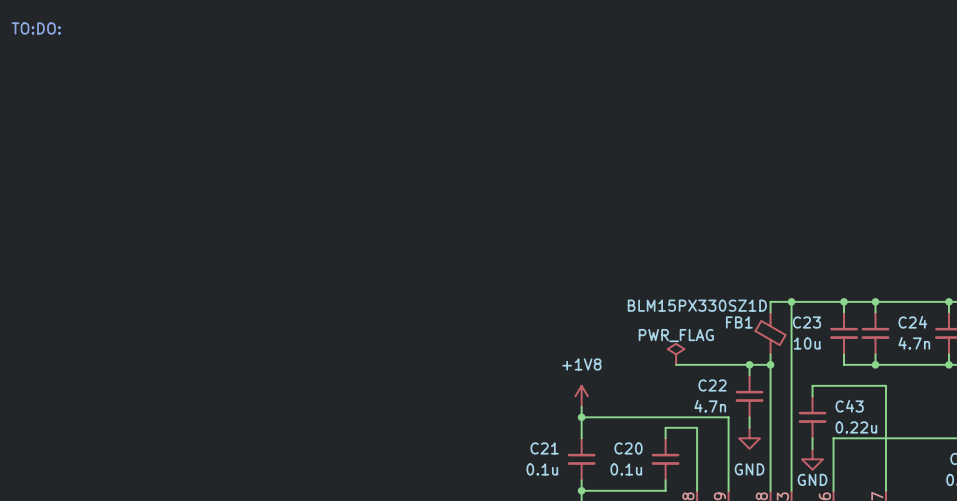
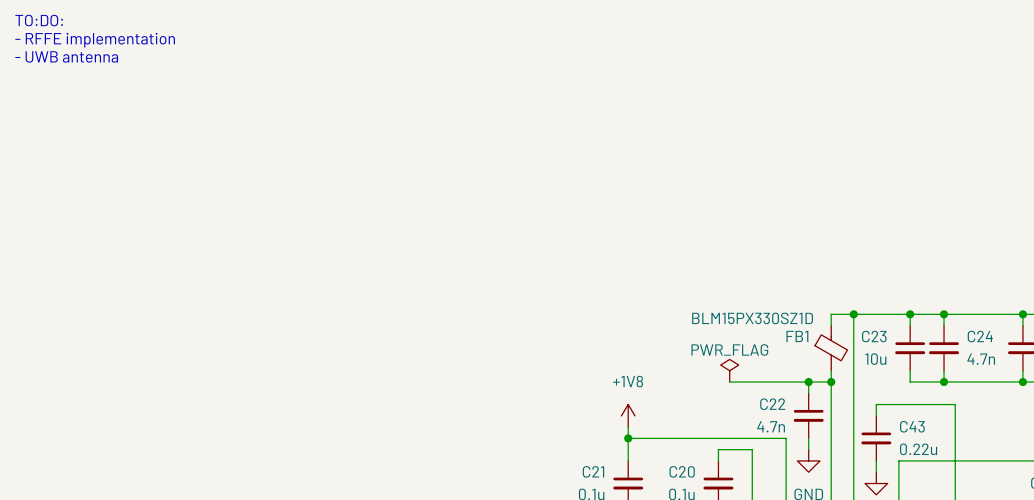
text: none -> - RFFE implementation (95, 40)
text: none -> - UWB antenna (66, 56)

